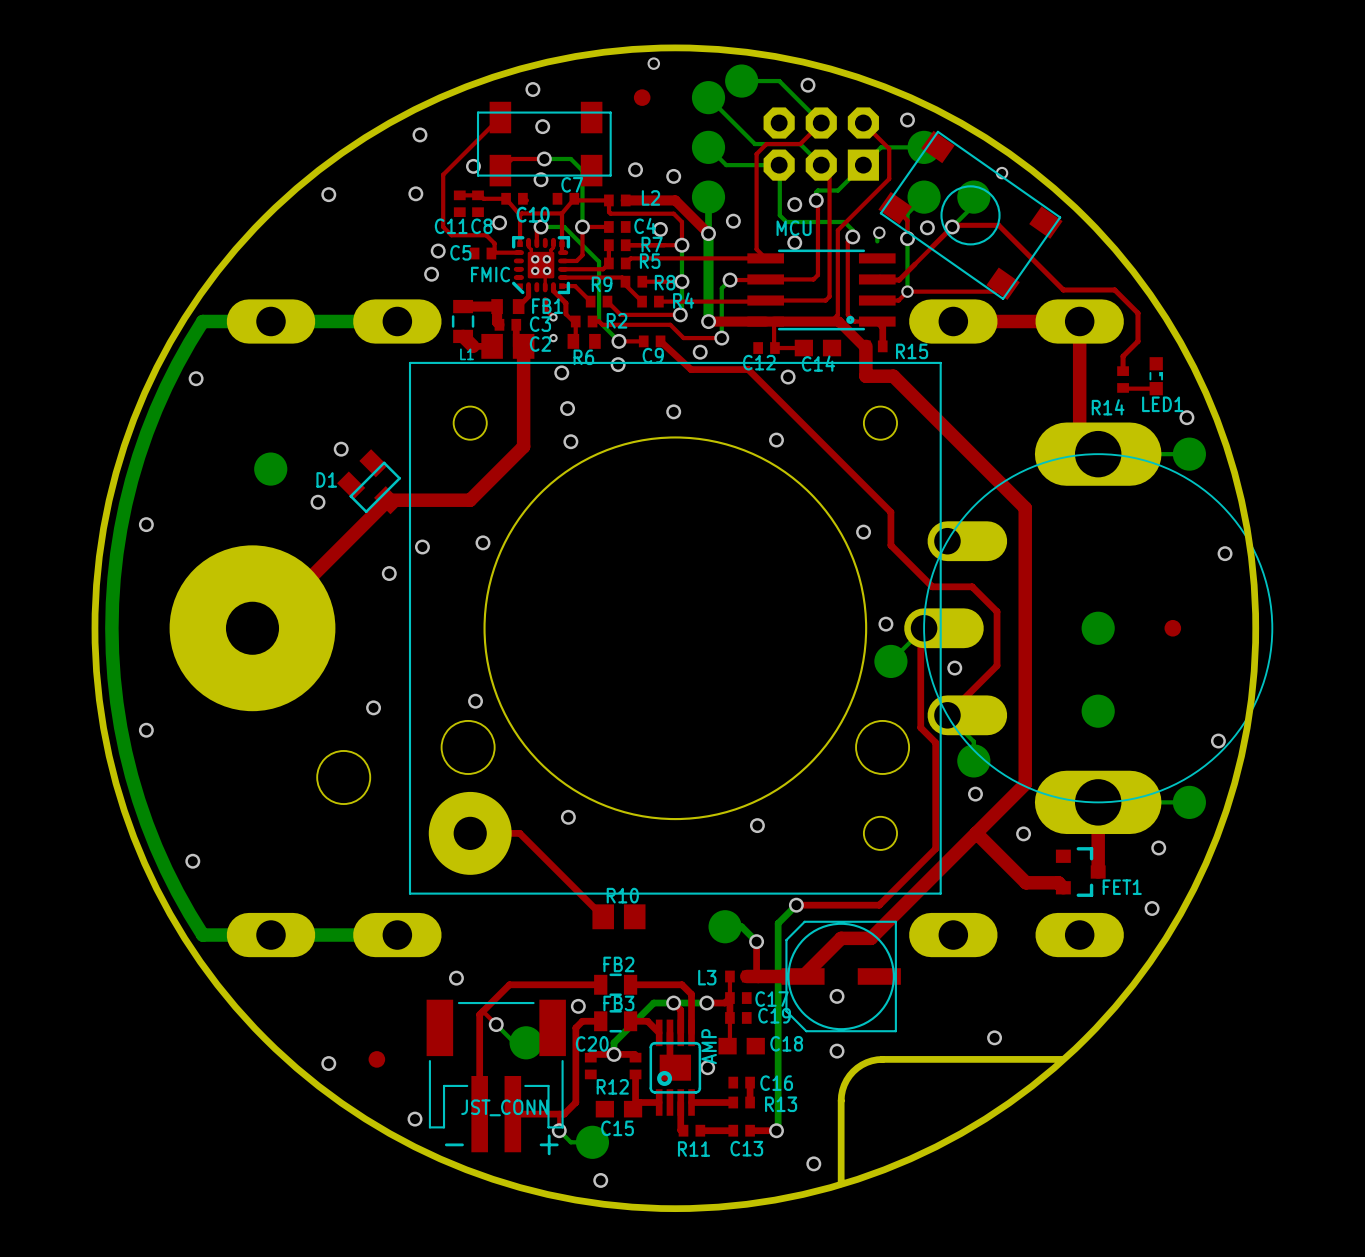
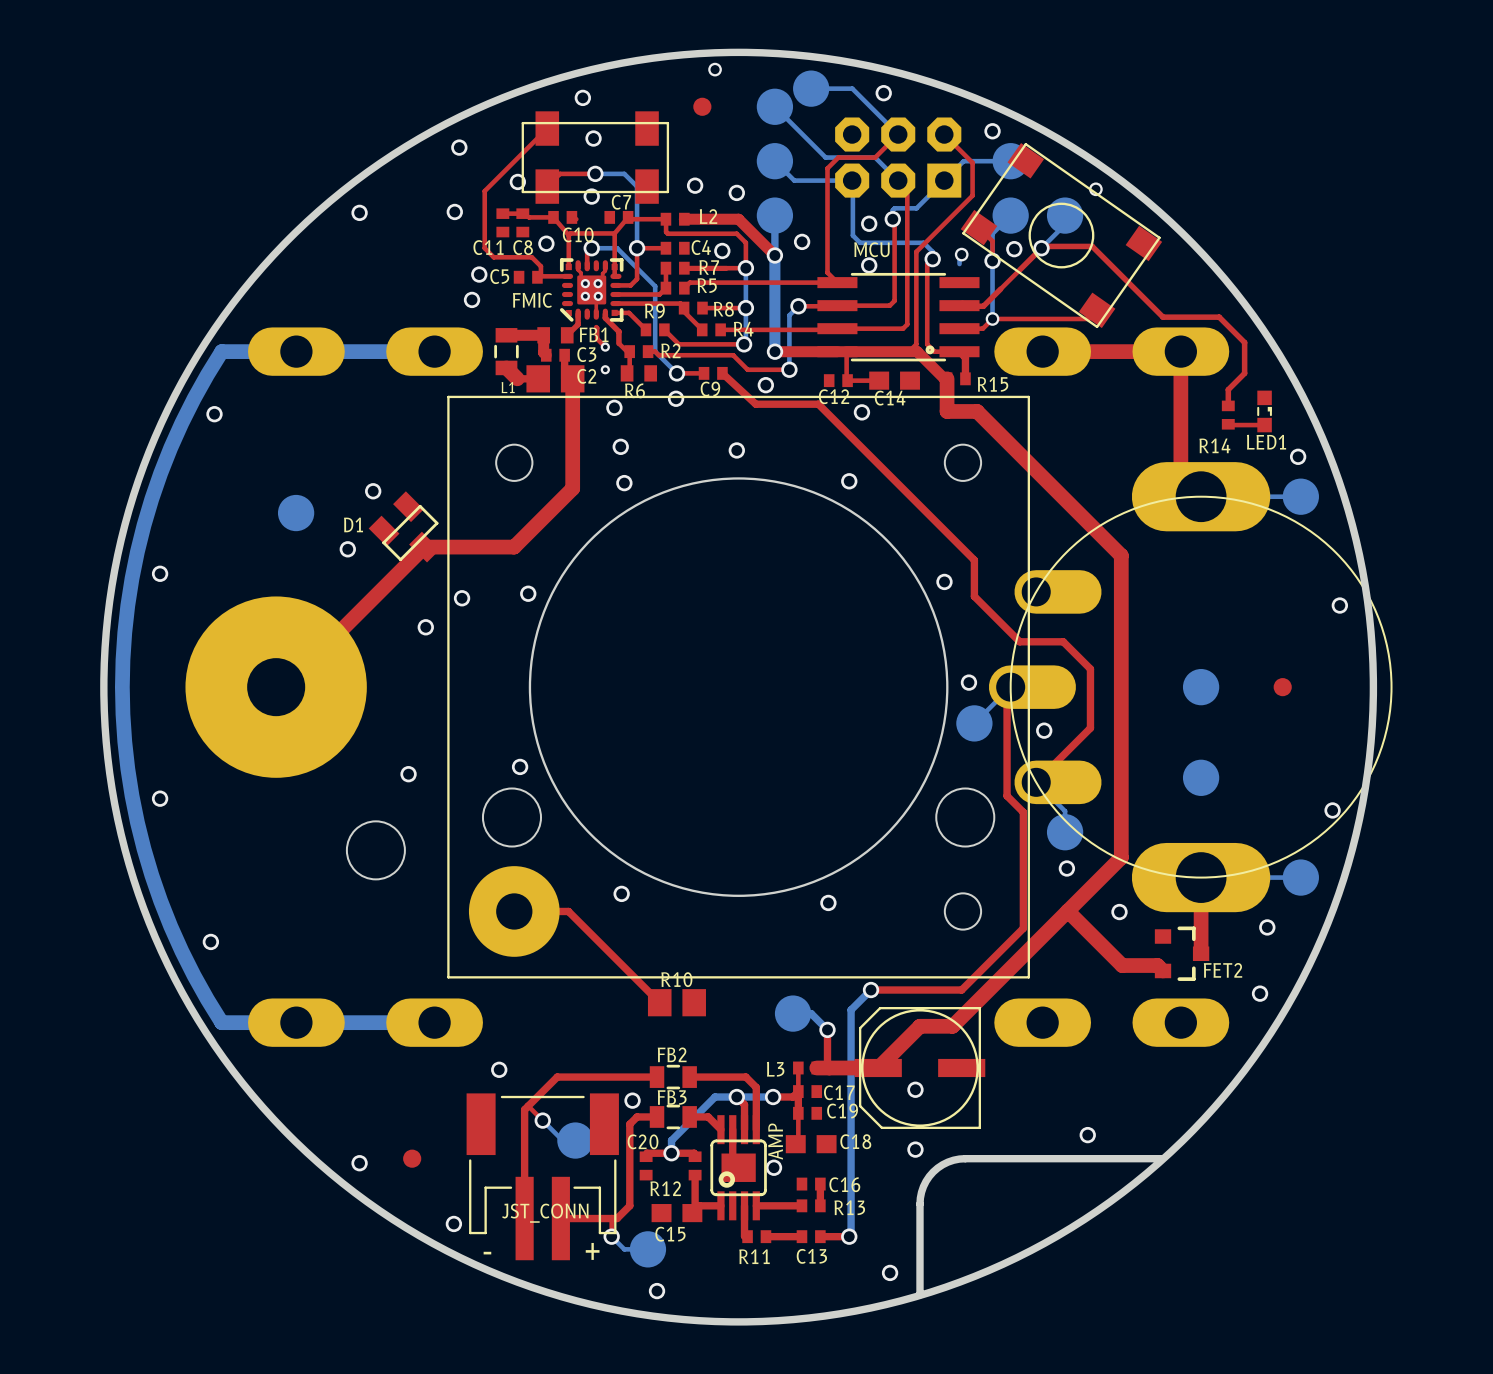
FET1 name: FET1 (1122, 887) -> FET2 (1223, 970)

